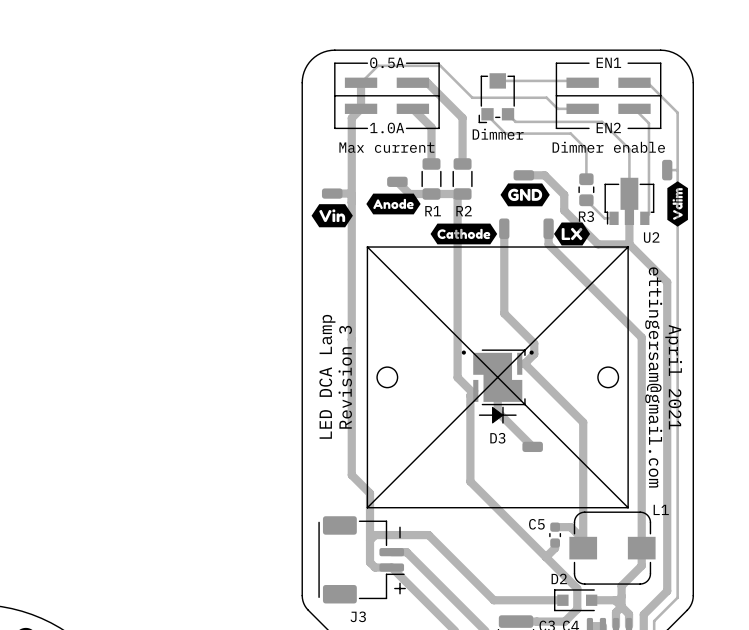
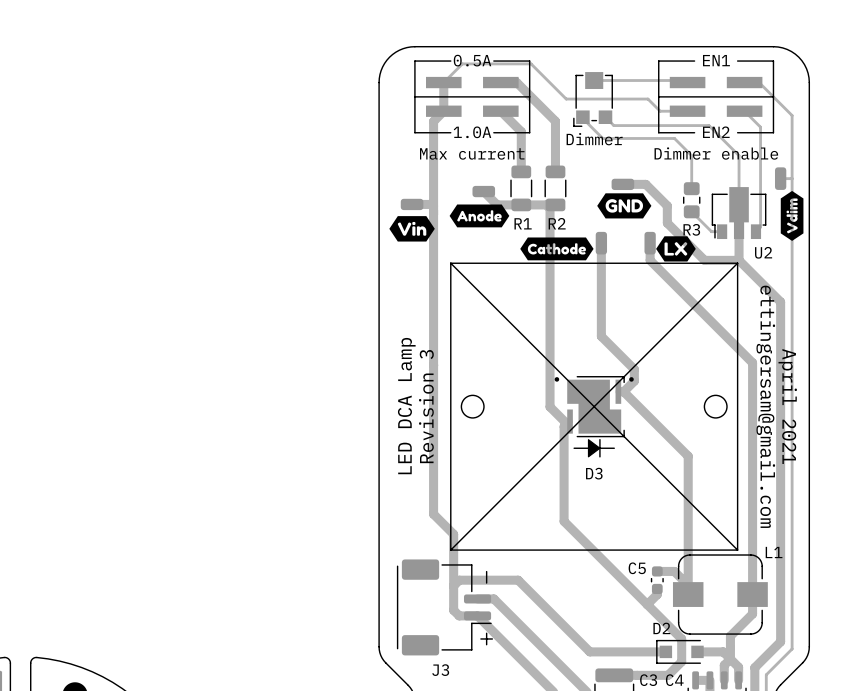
track: (497, 377) (497, 411) (532, 446) -> none
part: (532, 446) -> none

